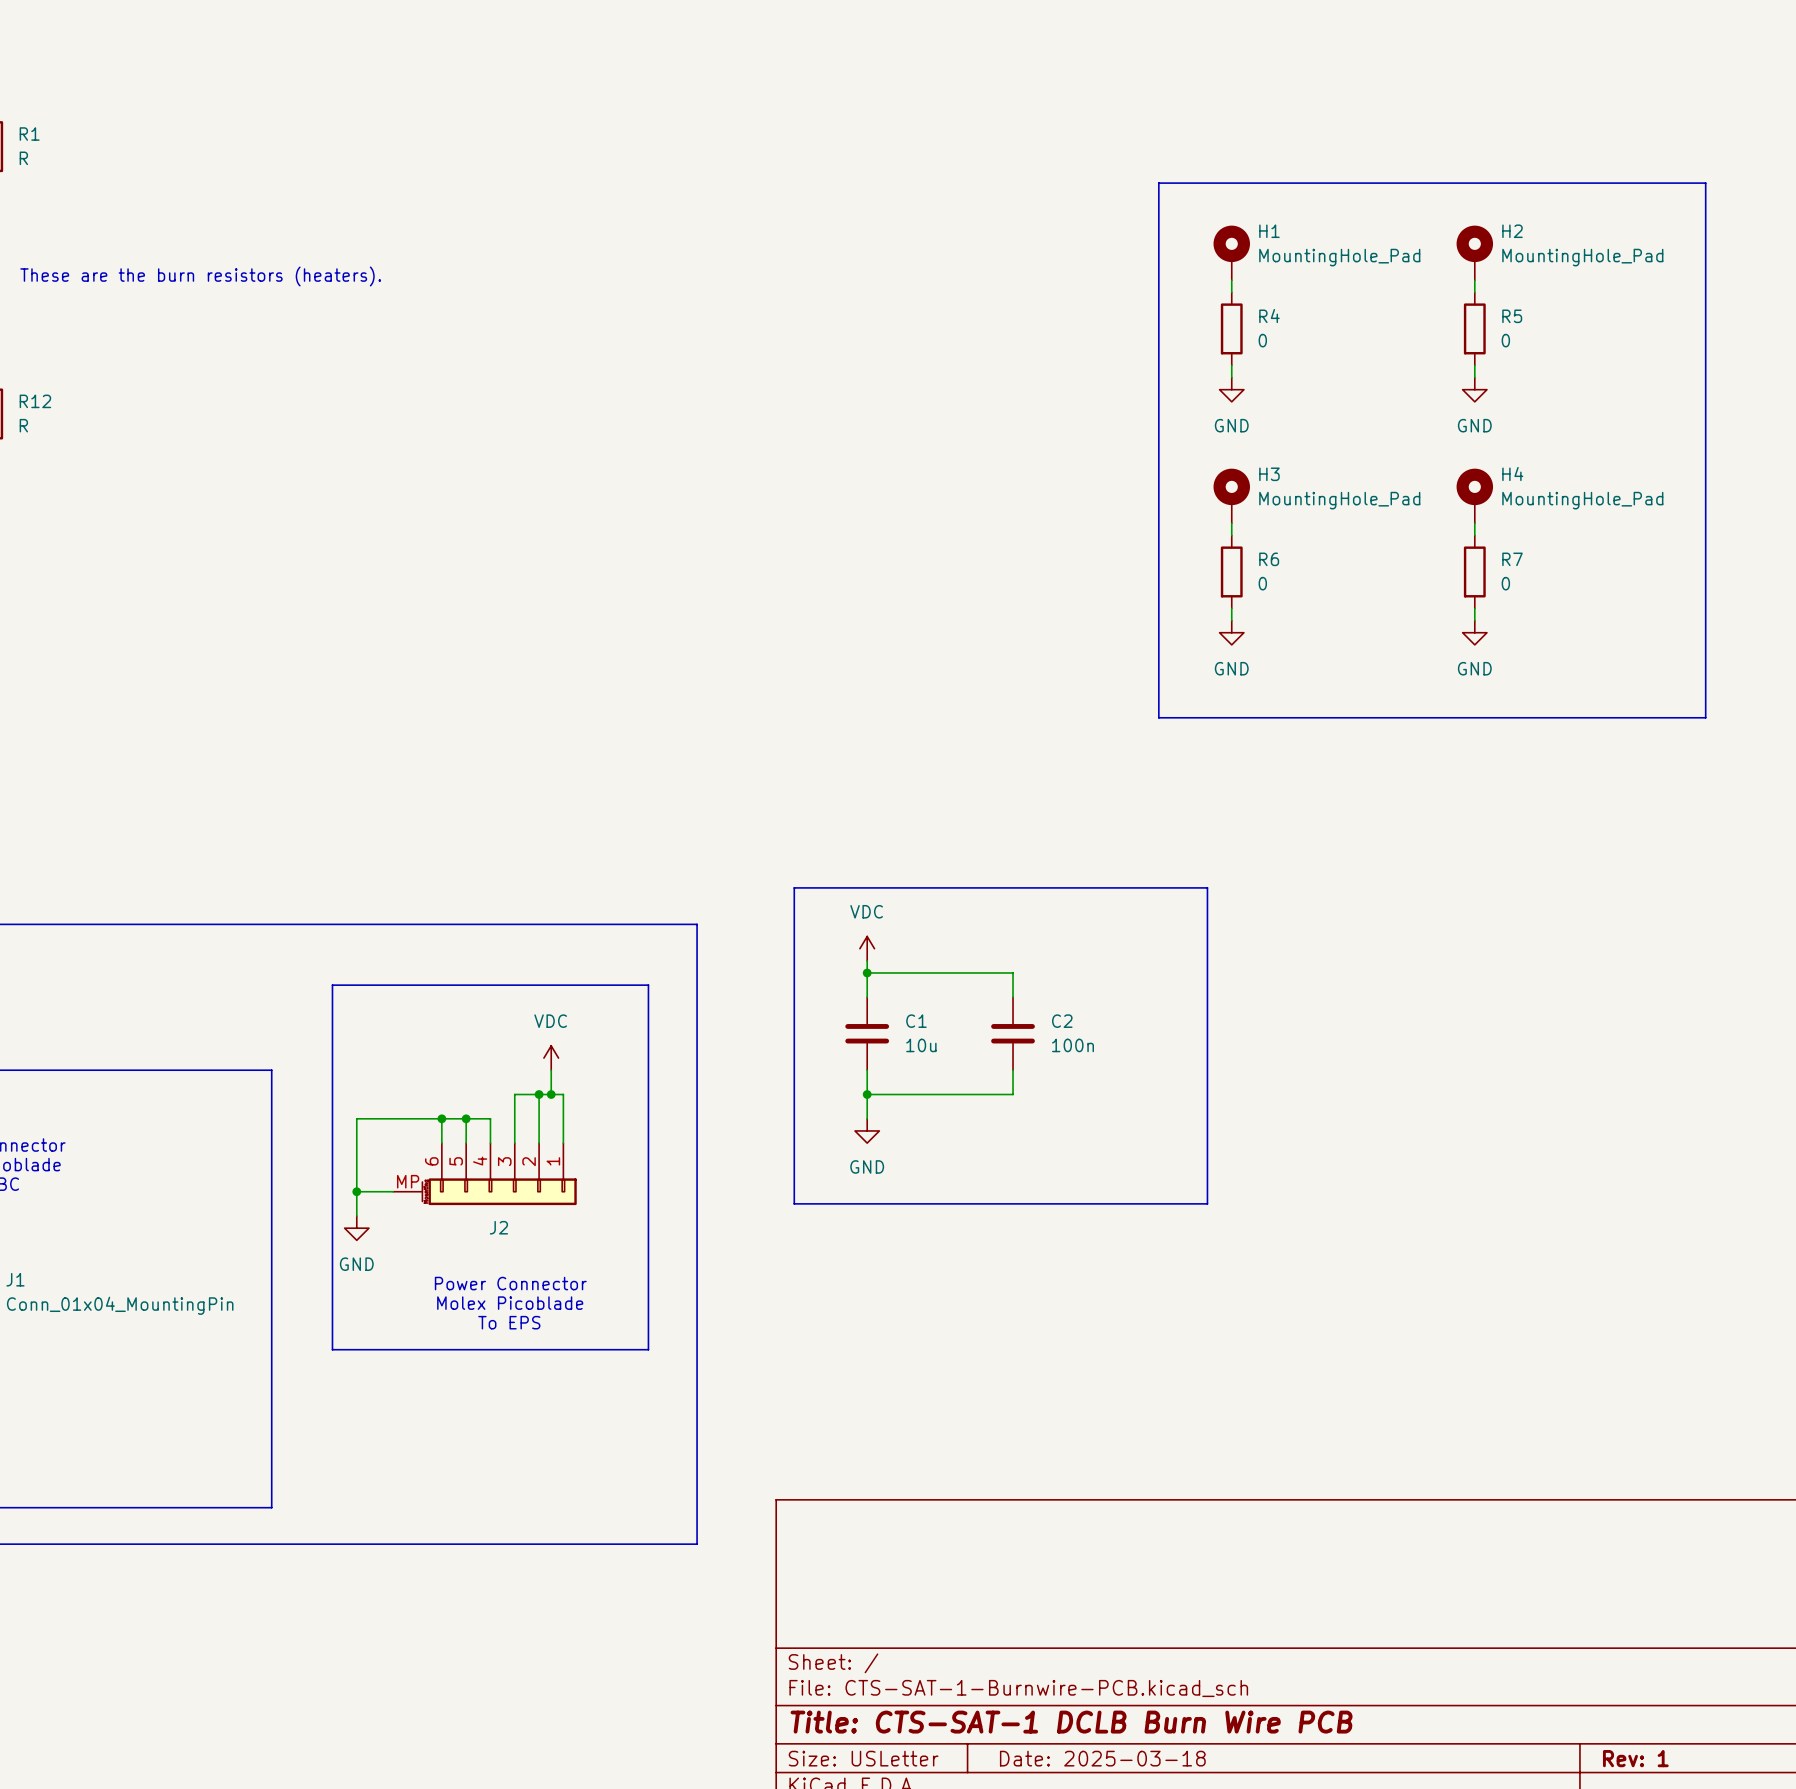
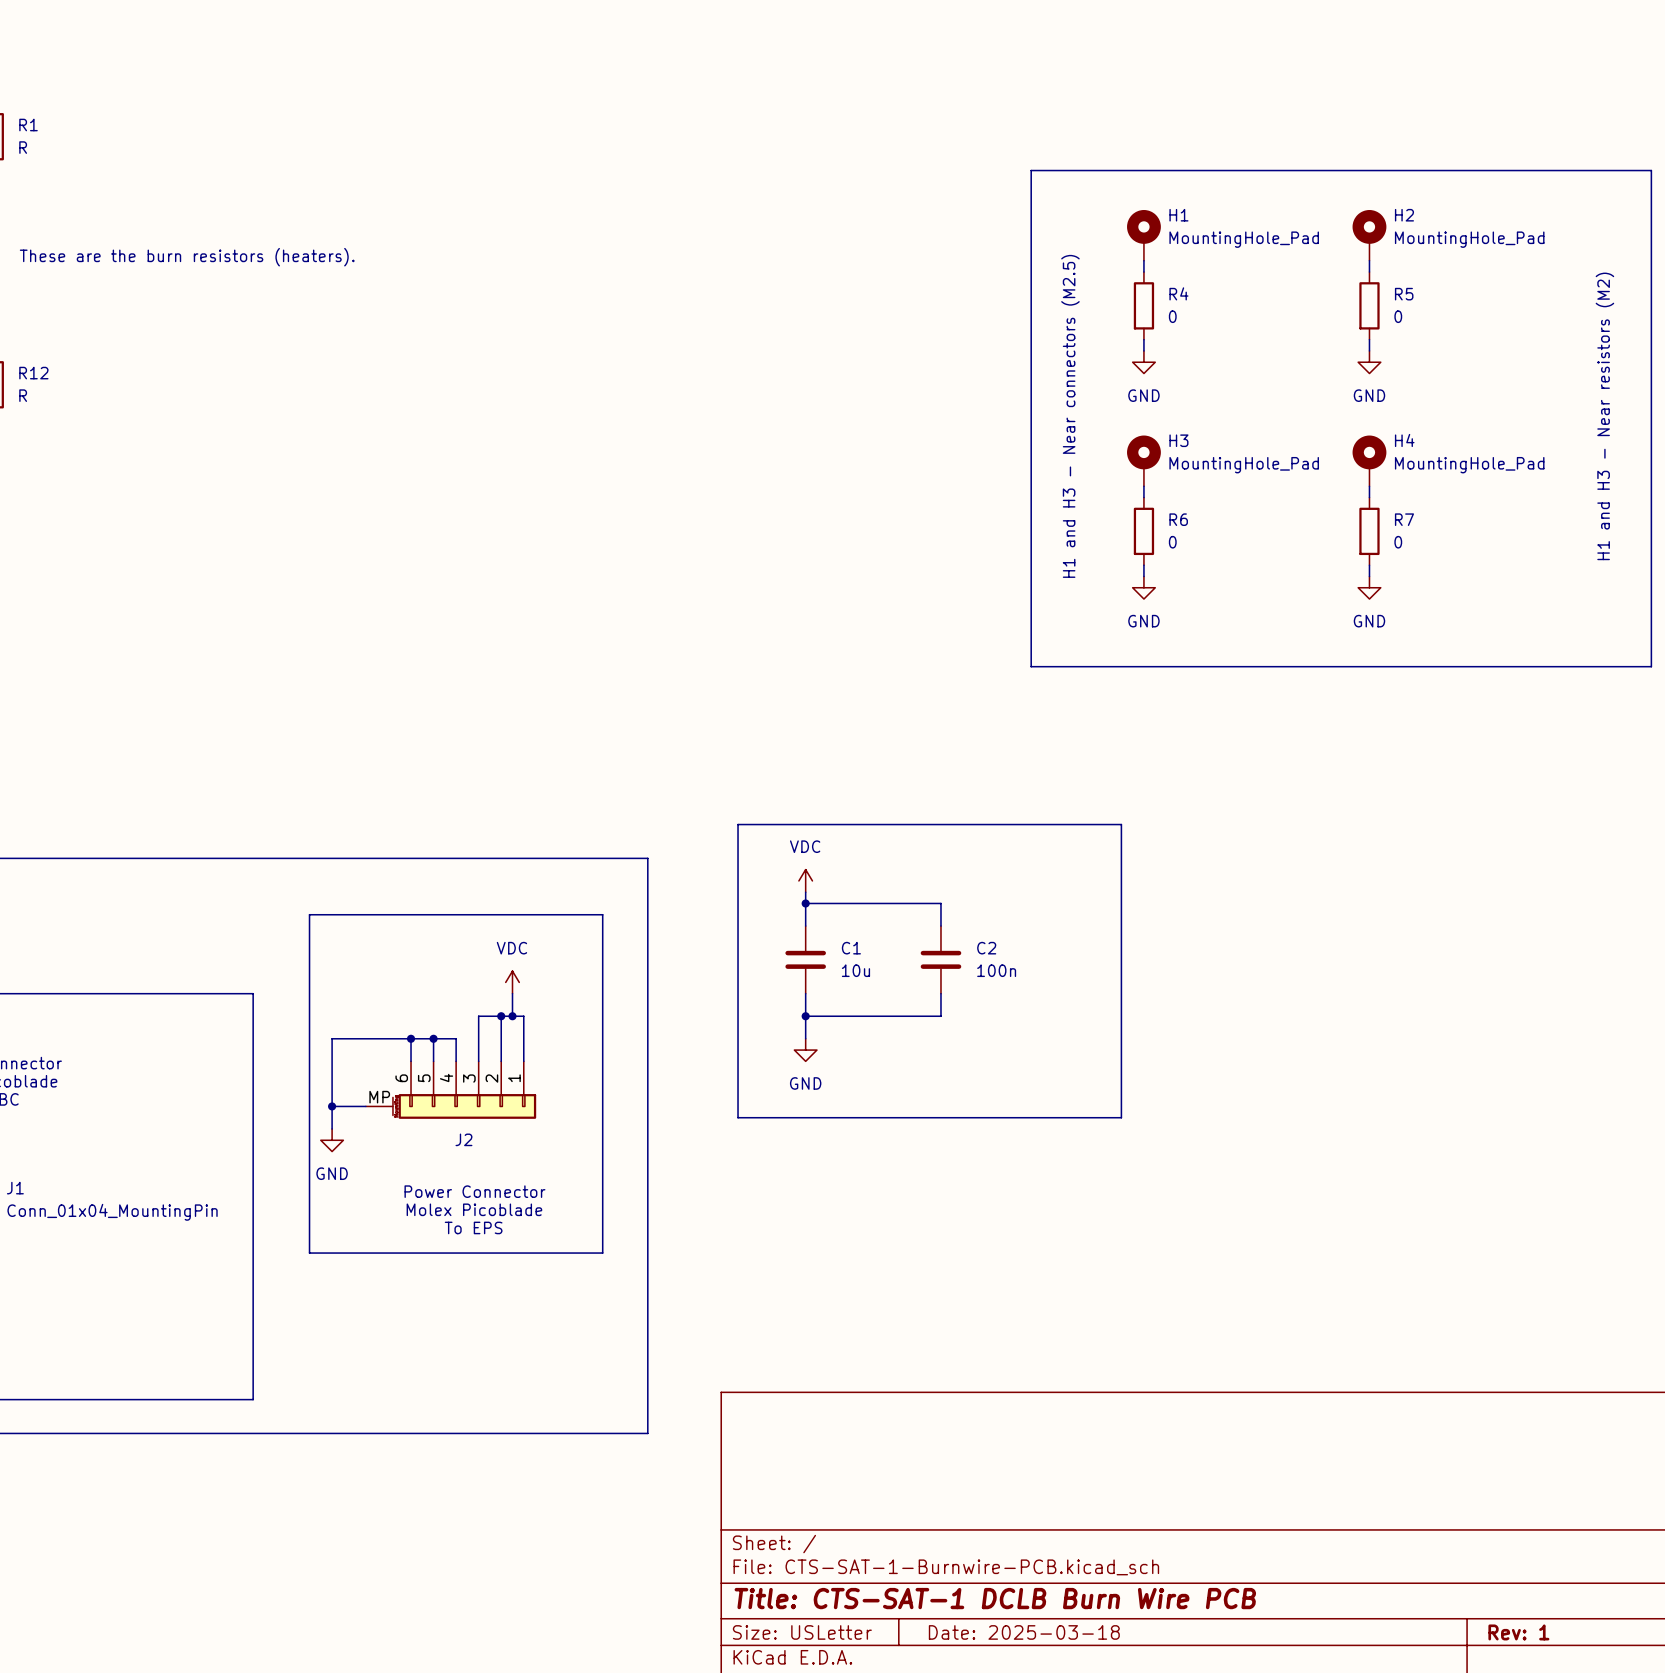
line: (1158, 183) (1158, 717) -> (1076, 170) (1031, 170) (1031, 666) (1076, 666)
line: (1705, 183) (1705, 717) -> (1583, 170) (1651, 170) (1651, 666) (1583, 666)
text: none -> H1 and H3 - Near connectors (M2.5) (1070, 416)
text: none -> H1 and H3 - Near resistors (M2) (1604, 416)

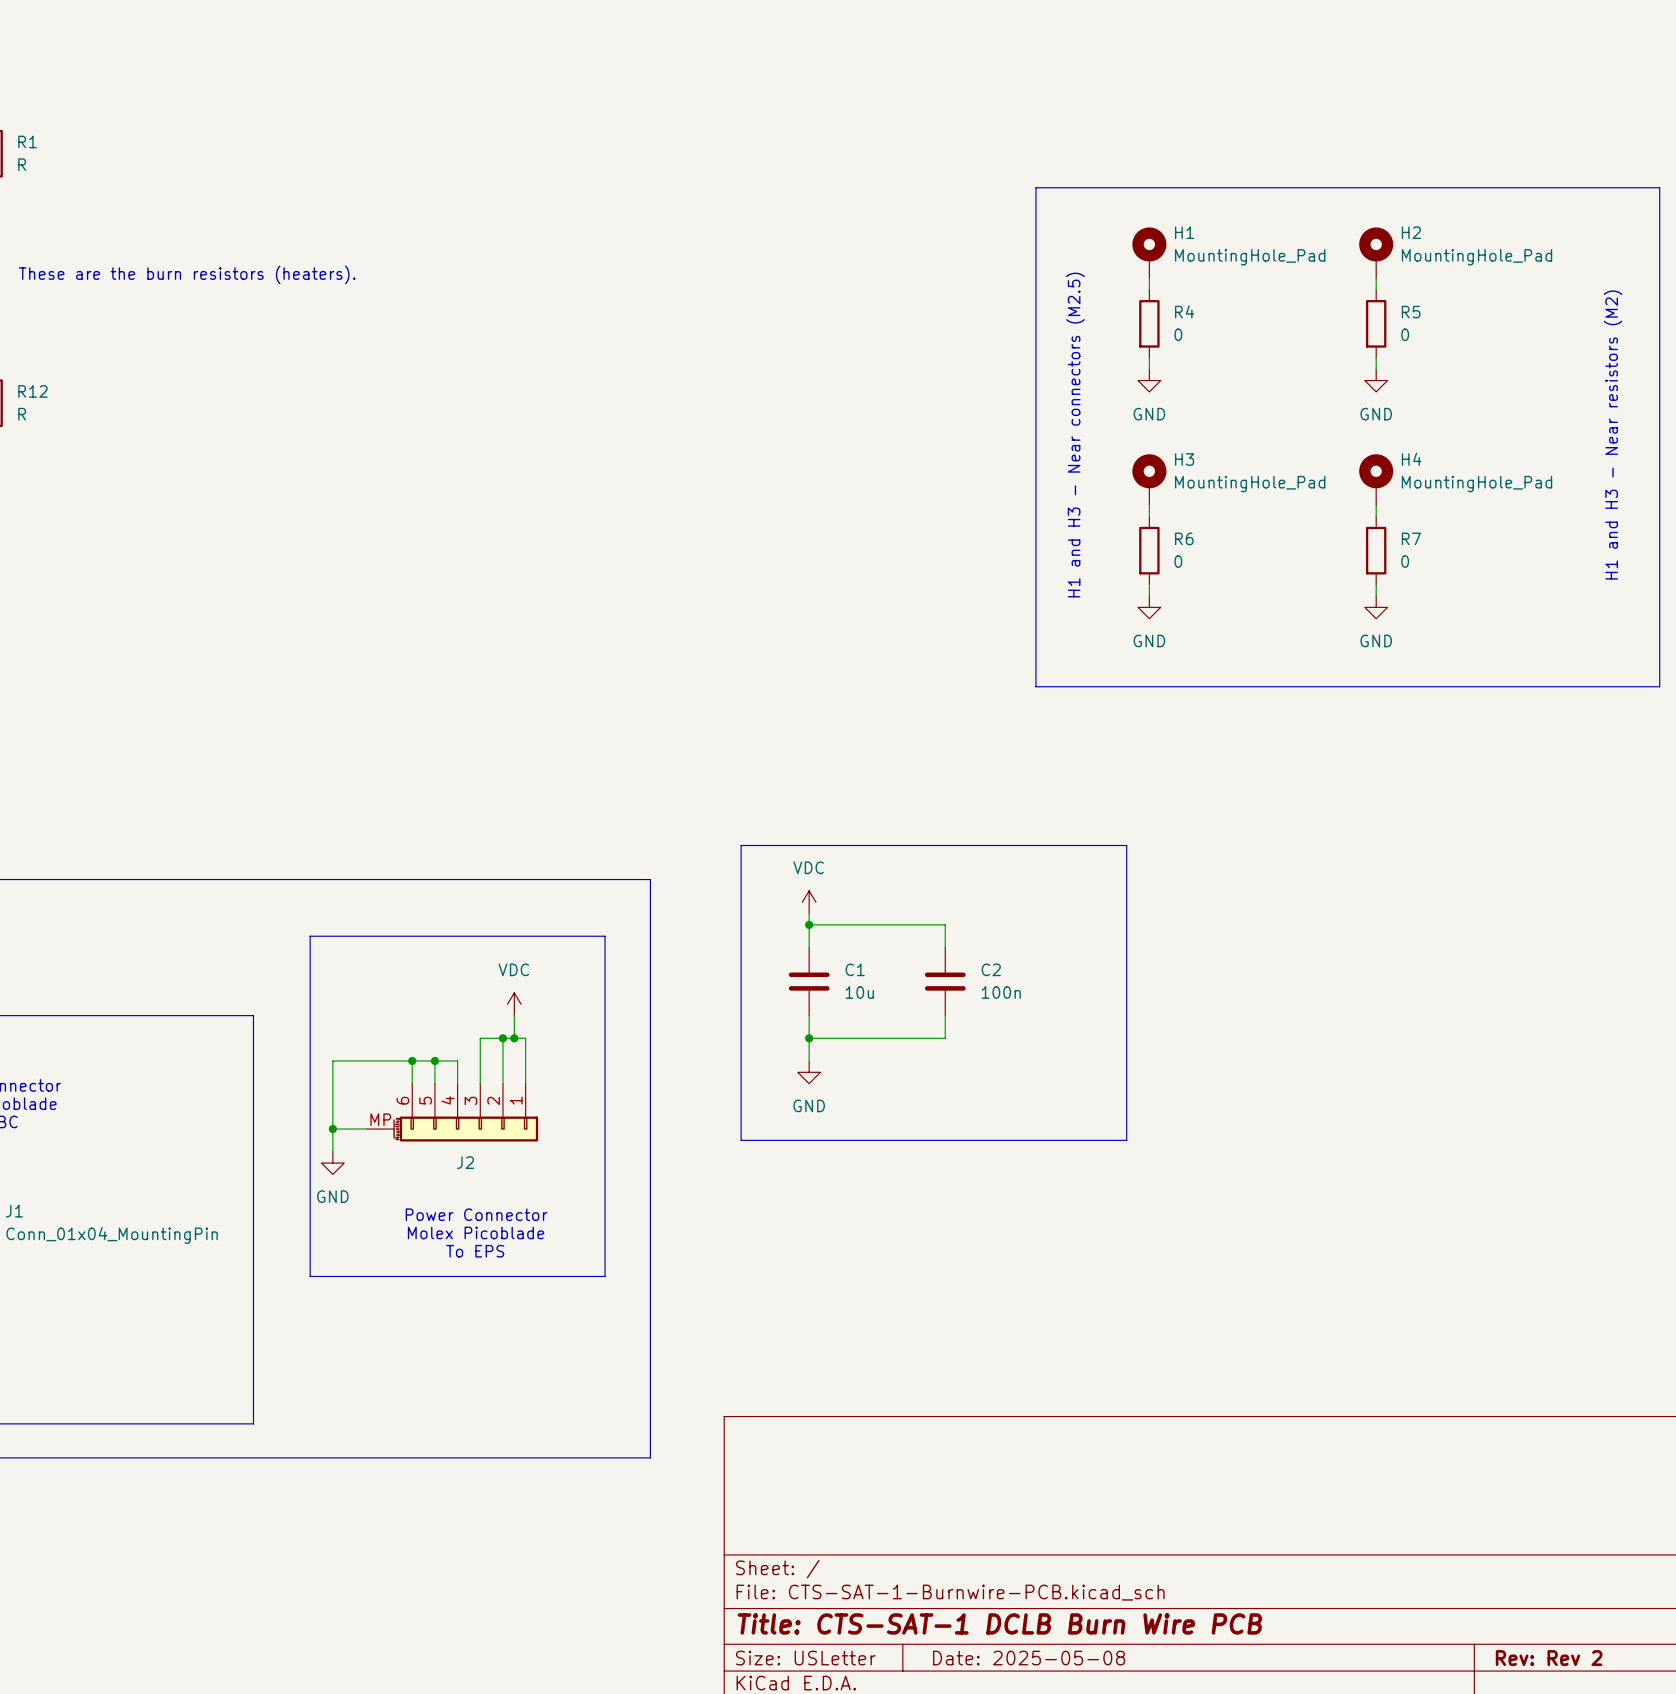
title block: Date: 2025-03-18 (1024, 1632) -> Date: 2025-05-08 (1029, 1658)
title block: Rev: 1 (1518, 1632) -> Rev: Rev 2 (1549, 1658)

